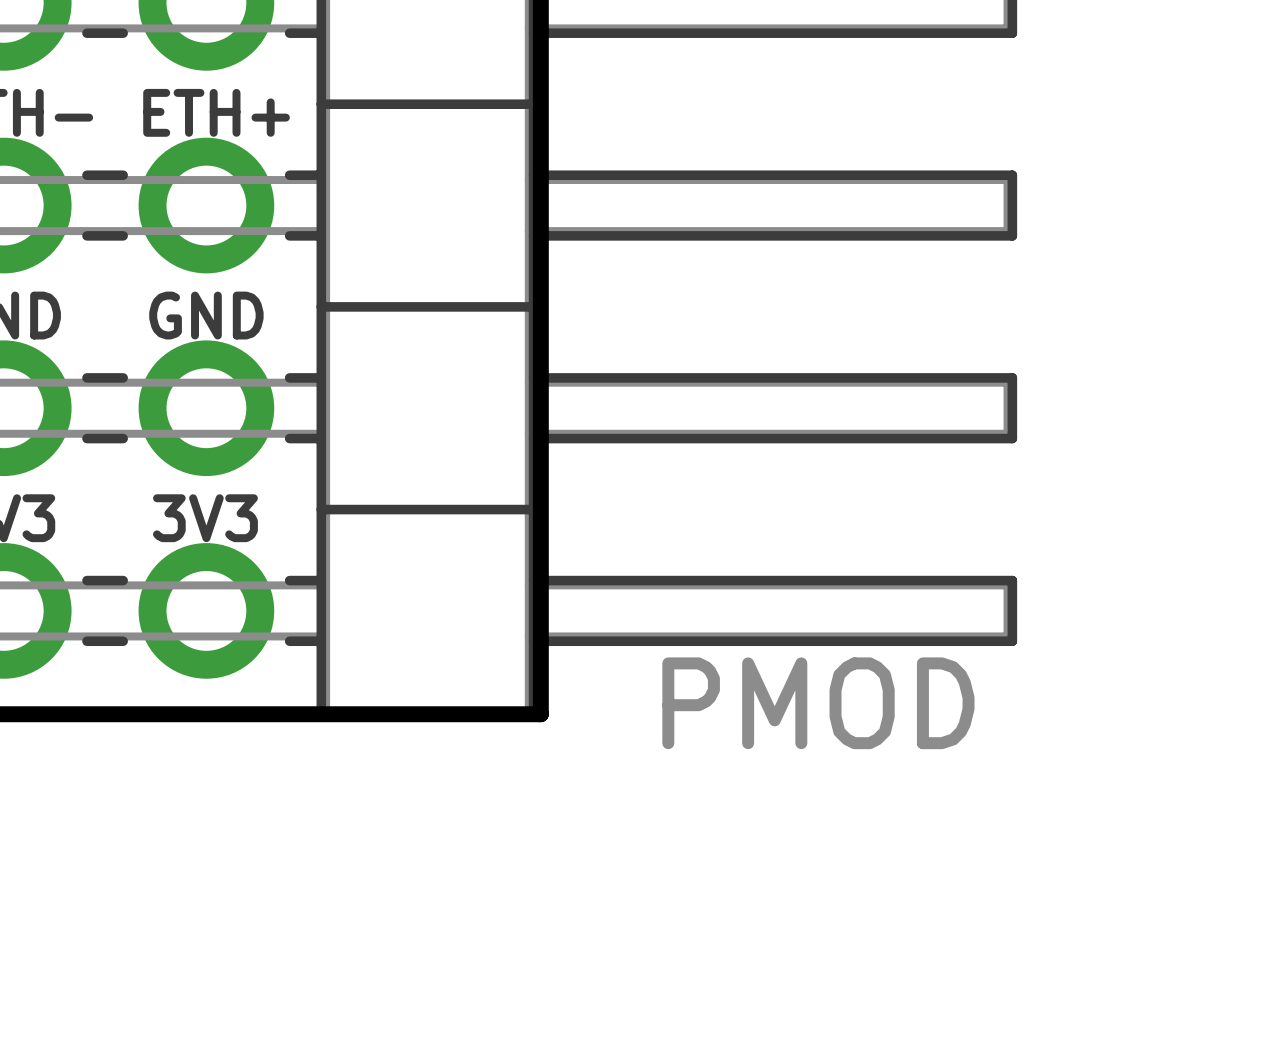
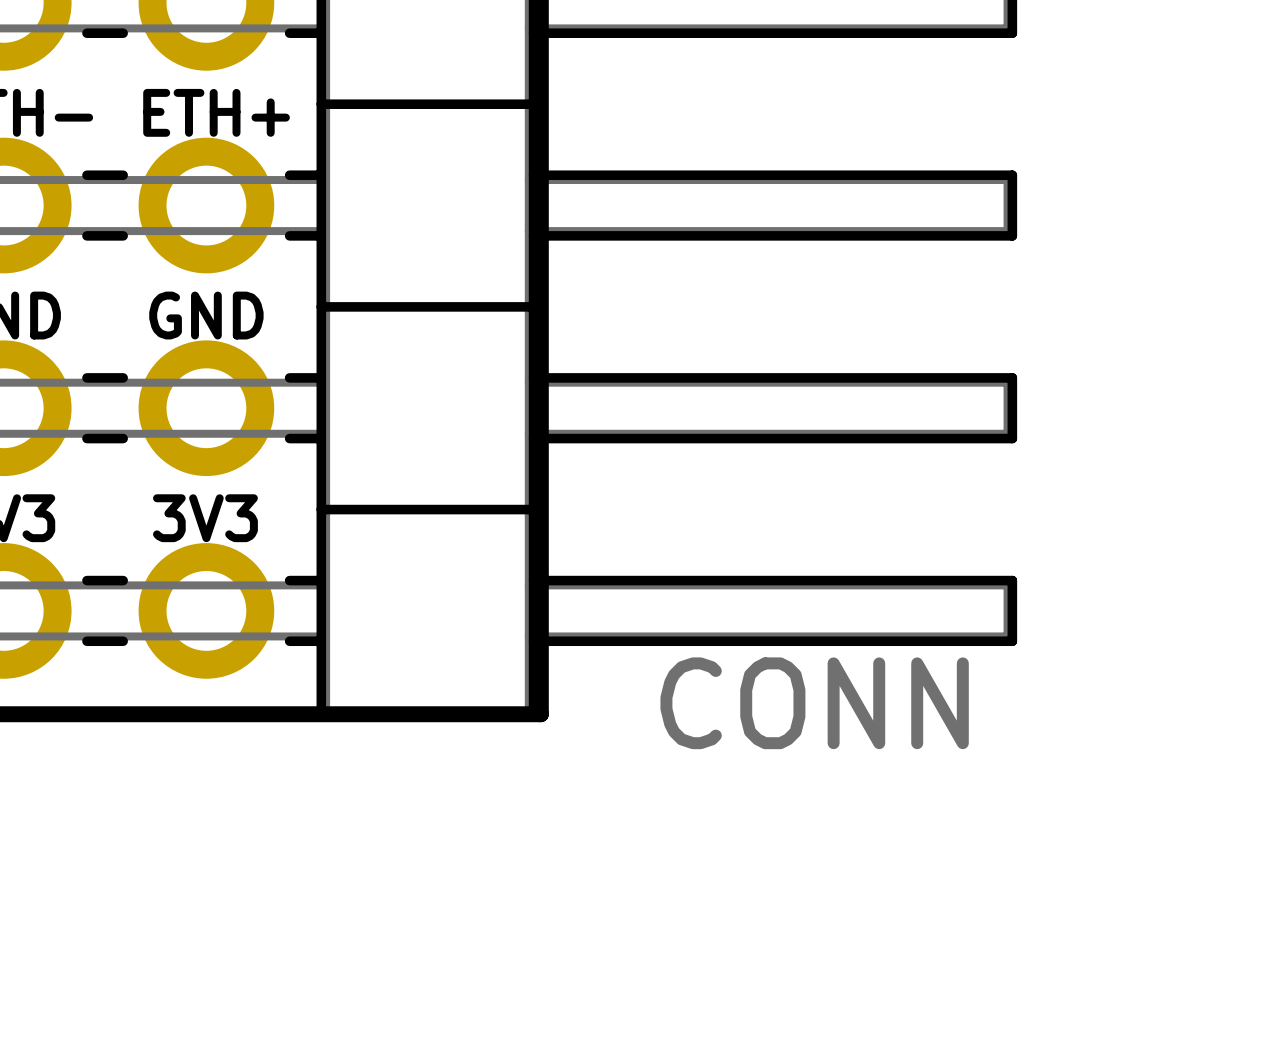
part value: PMOD (818, 703) -> CONN (814, 703)

